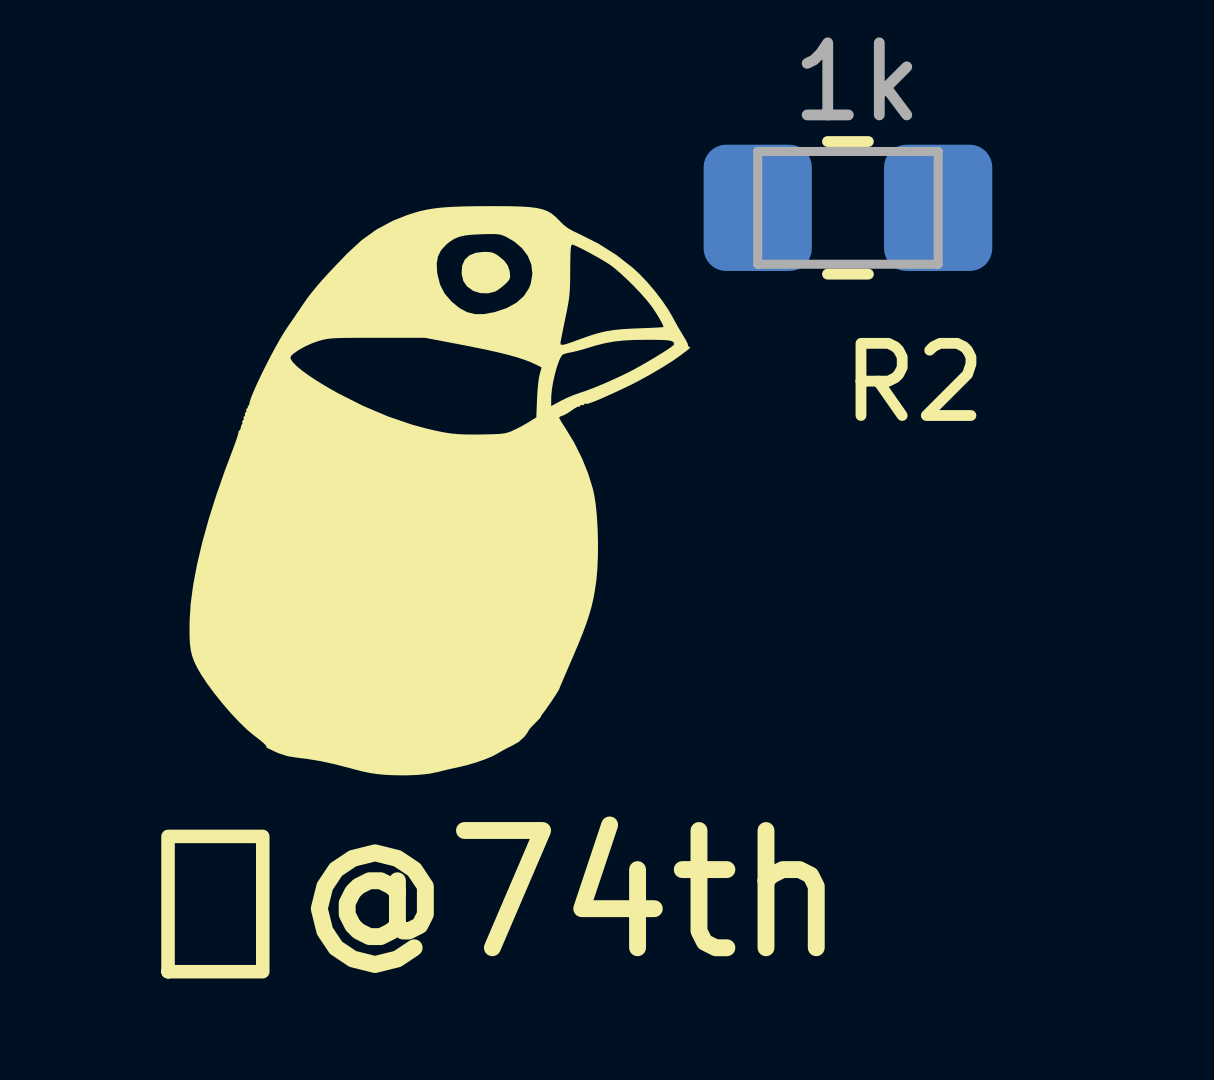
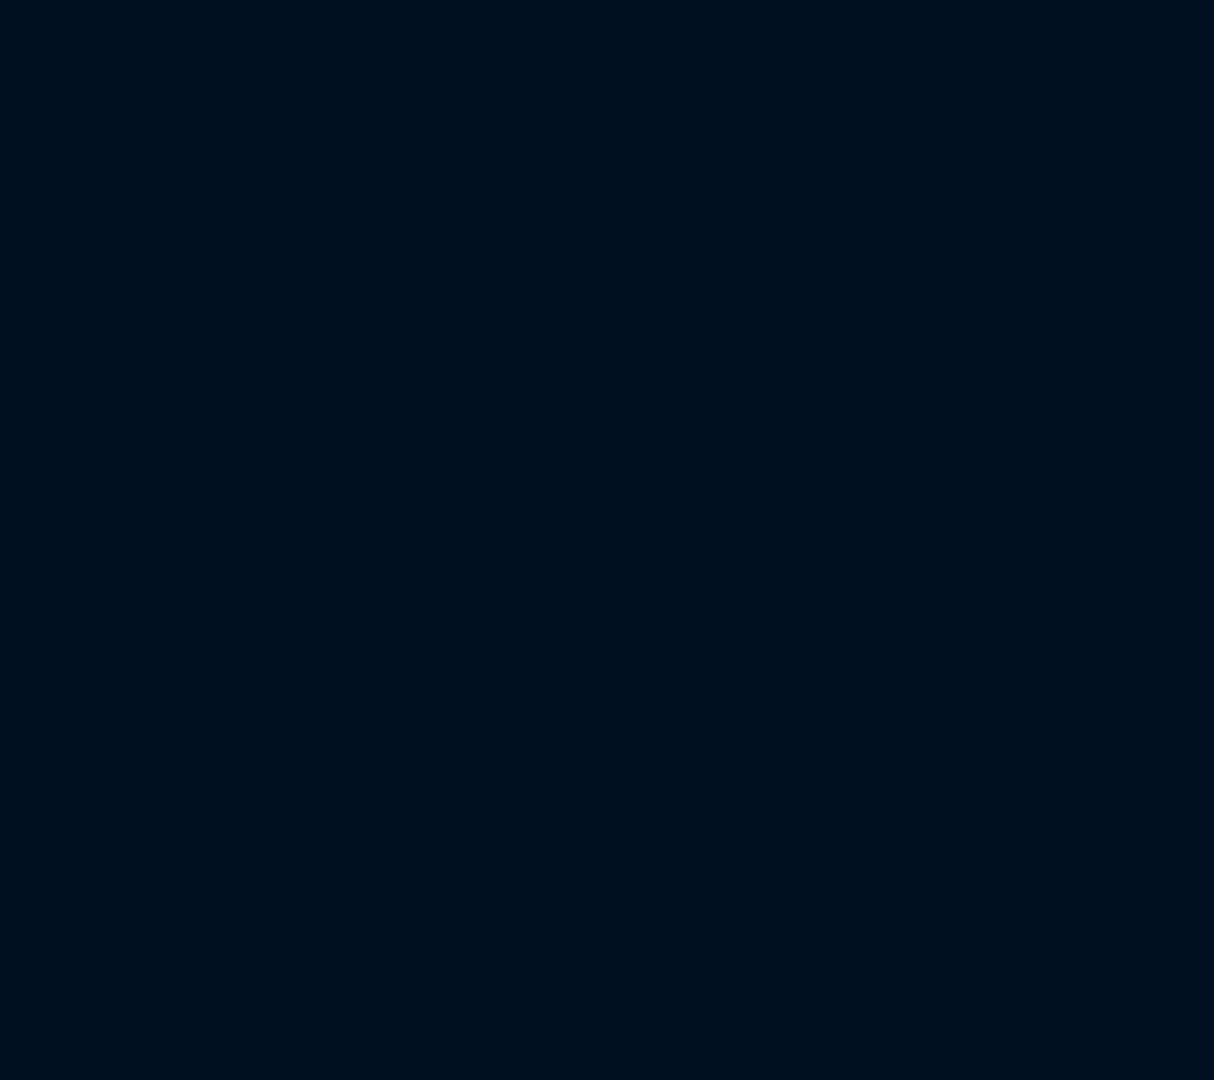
drawing: [189, 206, 691, 776] -> none
R2: 1k (847, 207) -> none

